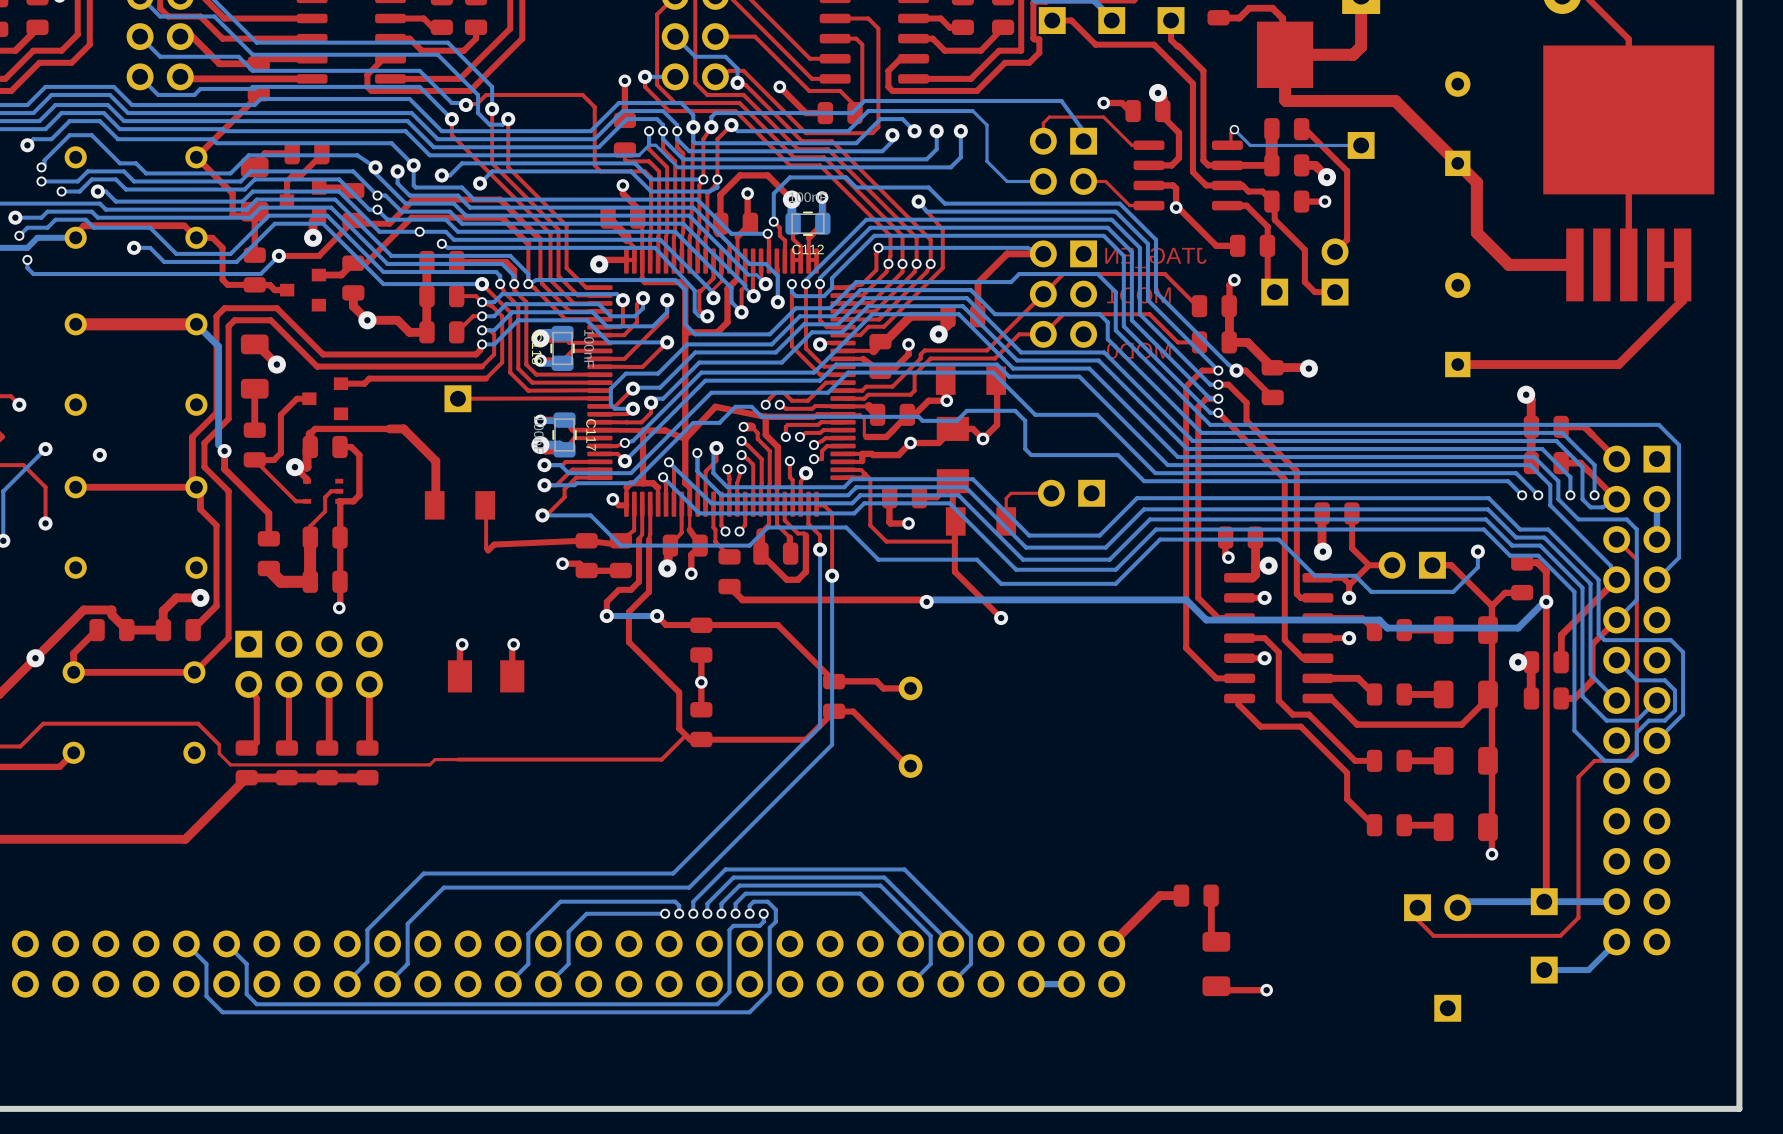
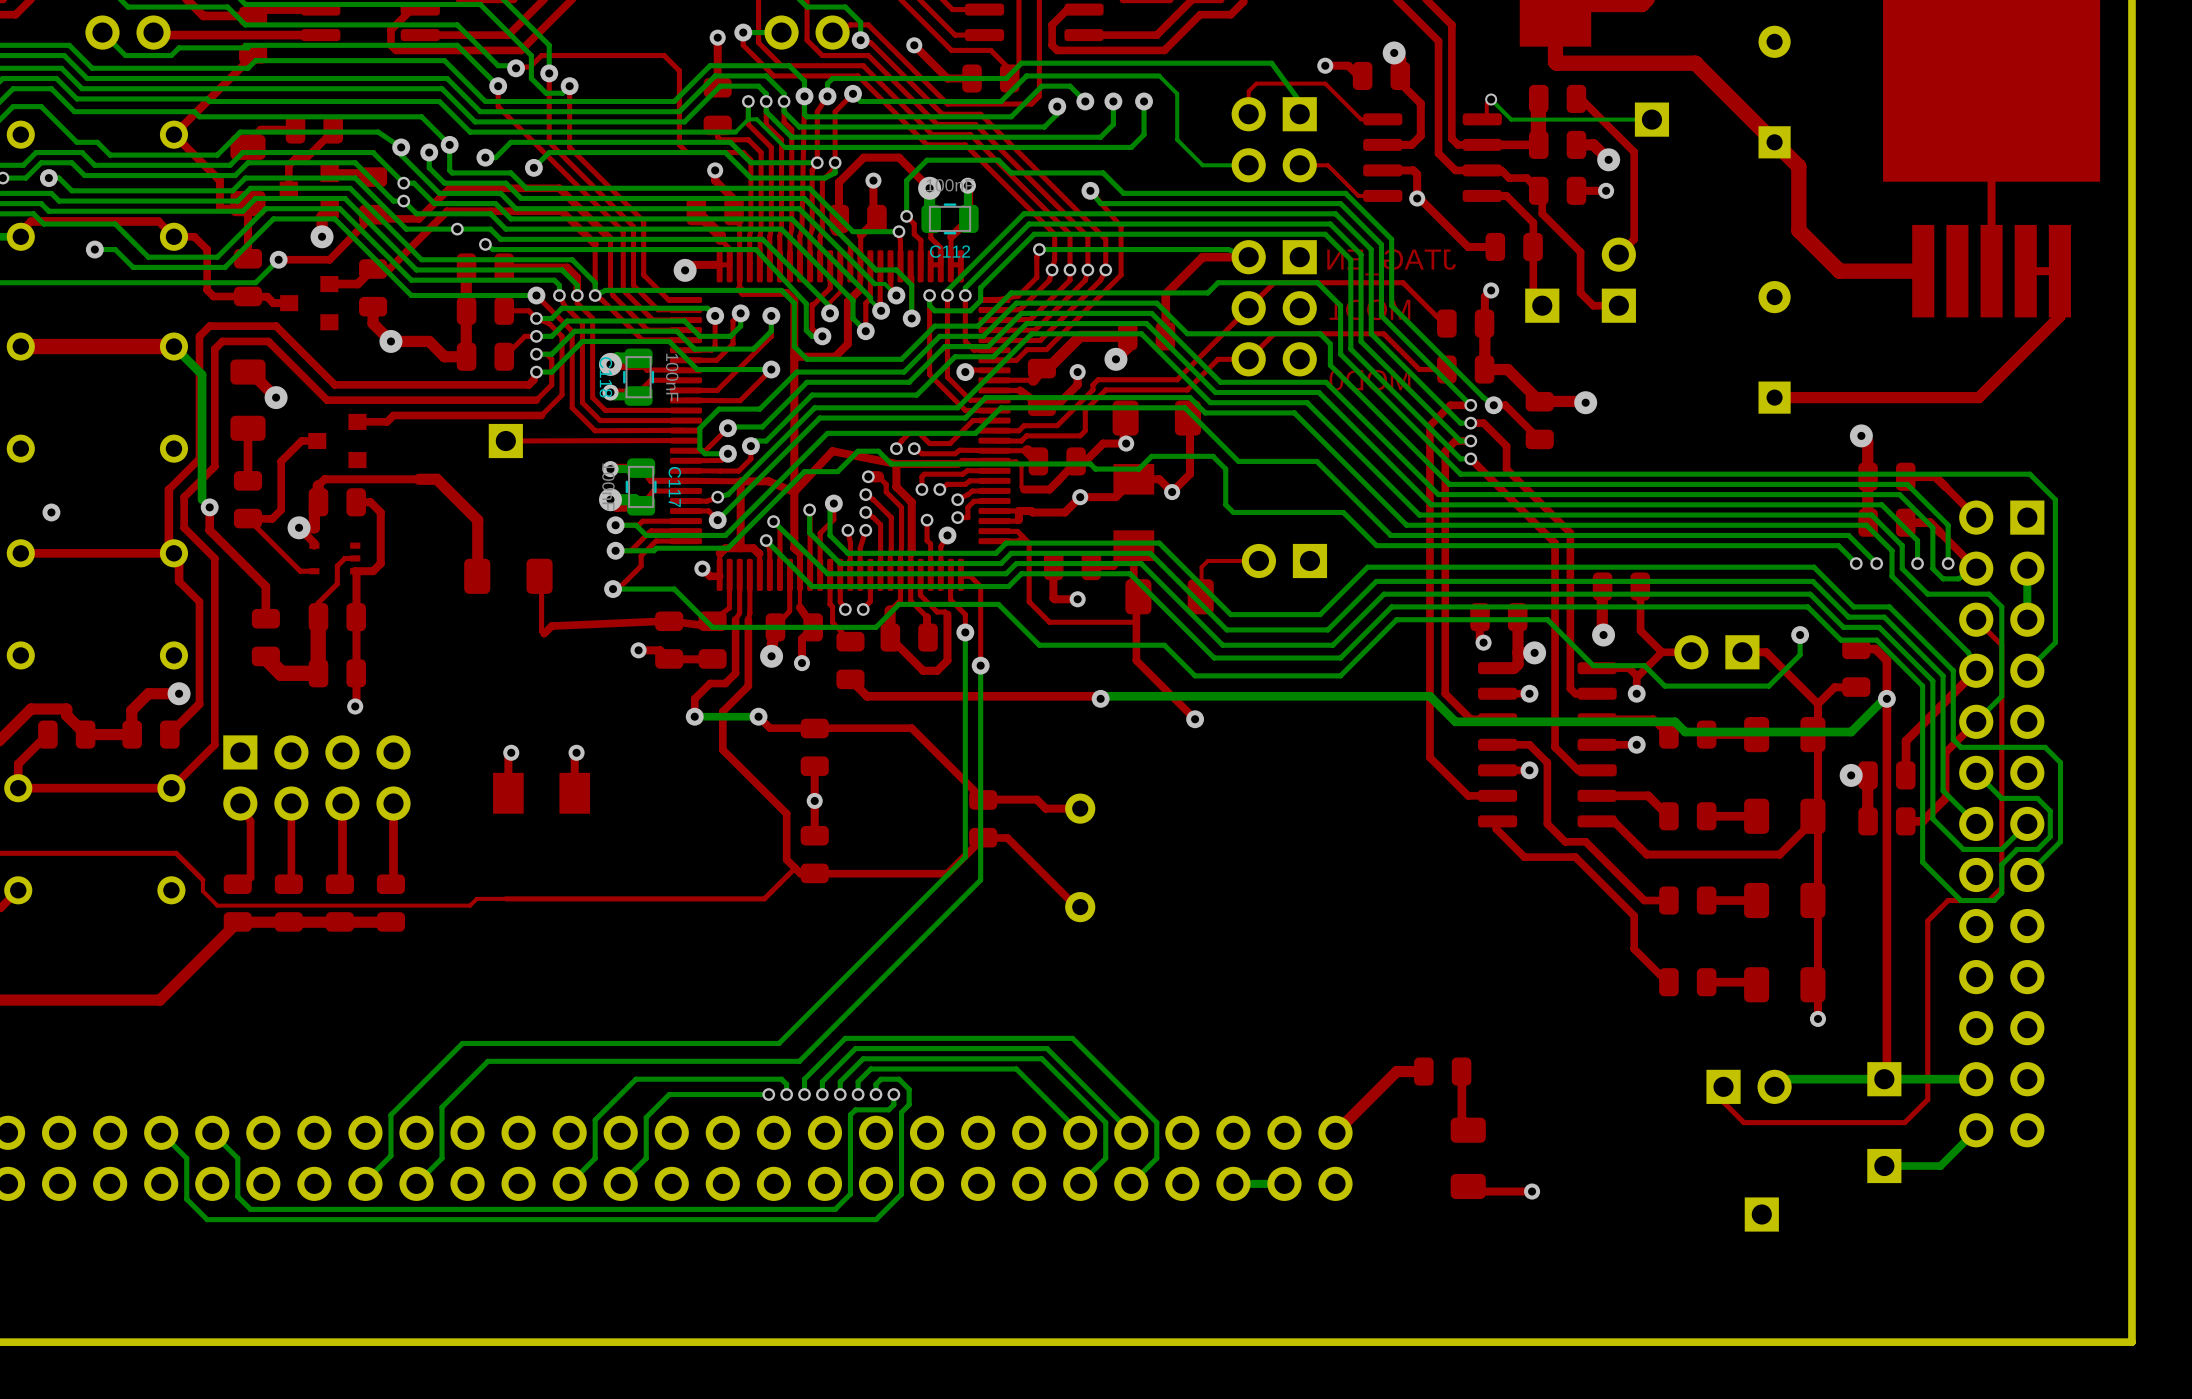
part footprint: [935, 366, 1007, 395] -> [1112, 400, 1202, 436]
part footprint: [424, 491, 496, 520] -> [464, 558, 553, 594]
part footprint: [945, 507, 1017, 536] -> [1125, 579, 1214, 615]

